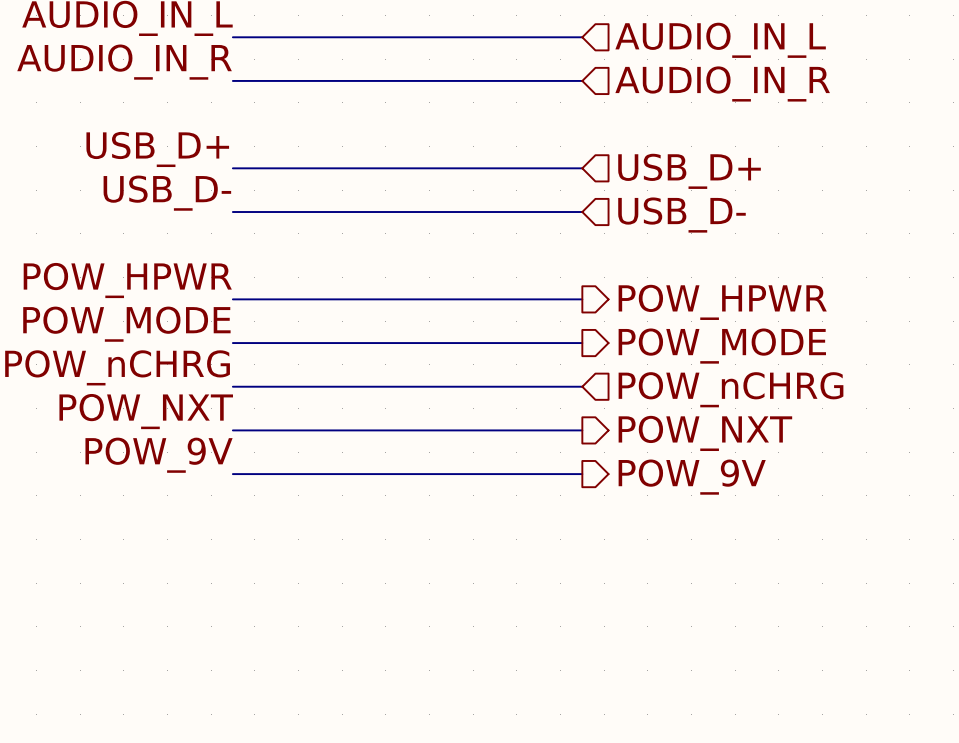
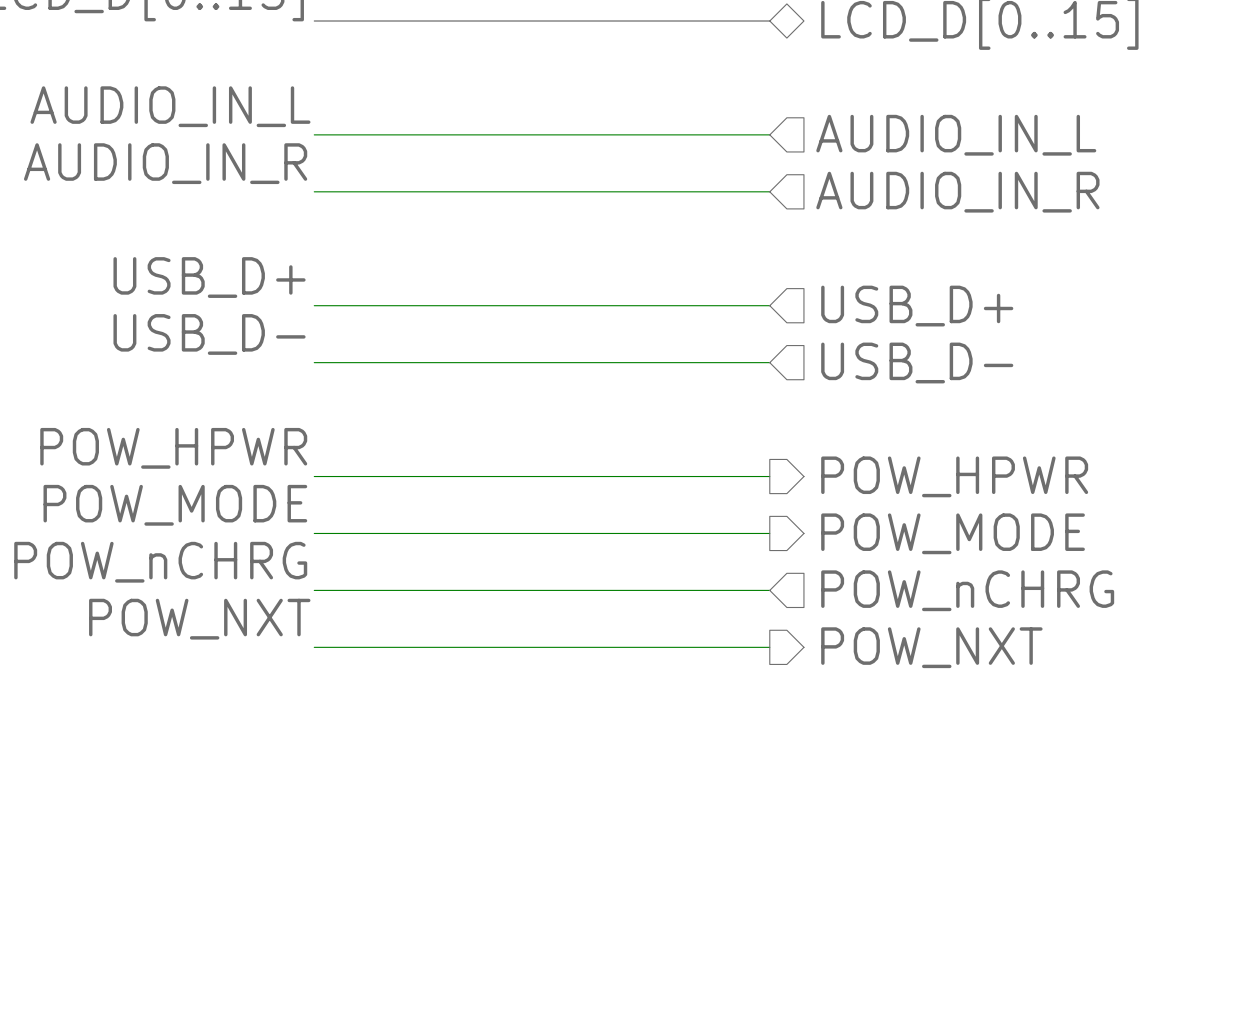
label: POW_9V (159, 455) -> none
wire: (232, 474) (582, 474) -> none
hierarchical label: POW_9V (692, 477) -> none

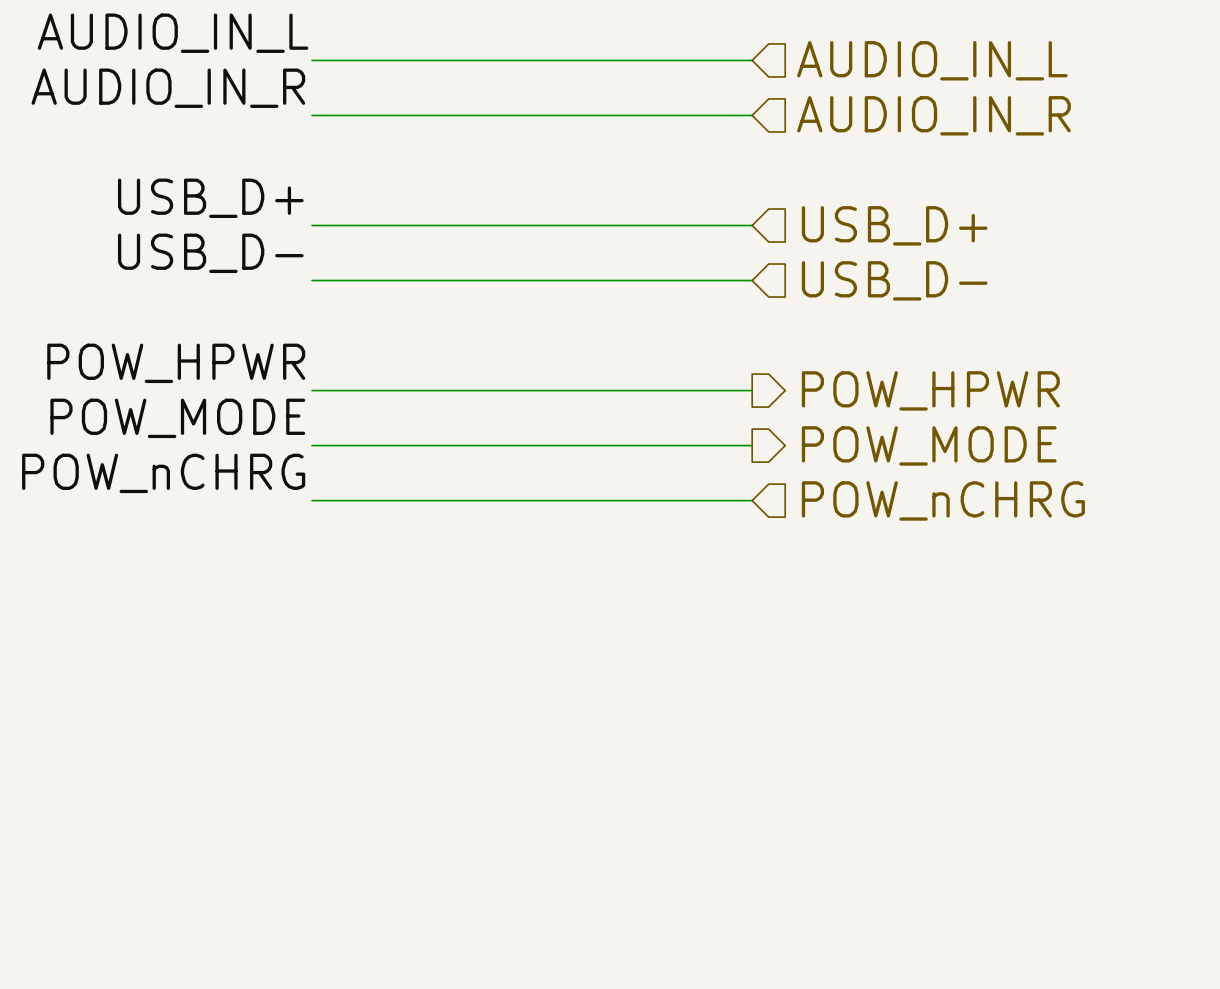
label: POW_NXT (199, 619) -> none
wire: (314, 647) (769, 647) -> none
hierarchical label: POW_NXT (931, 647) -> none

